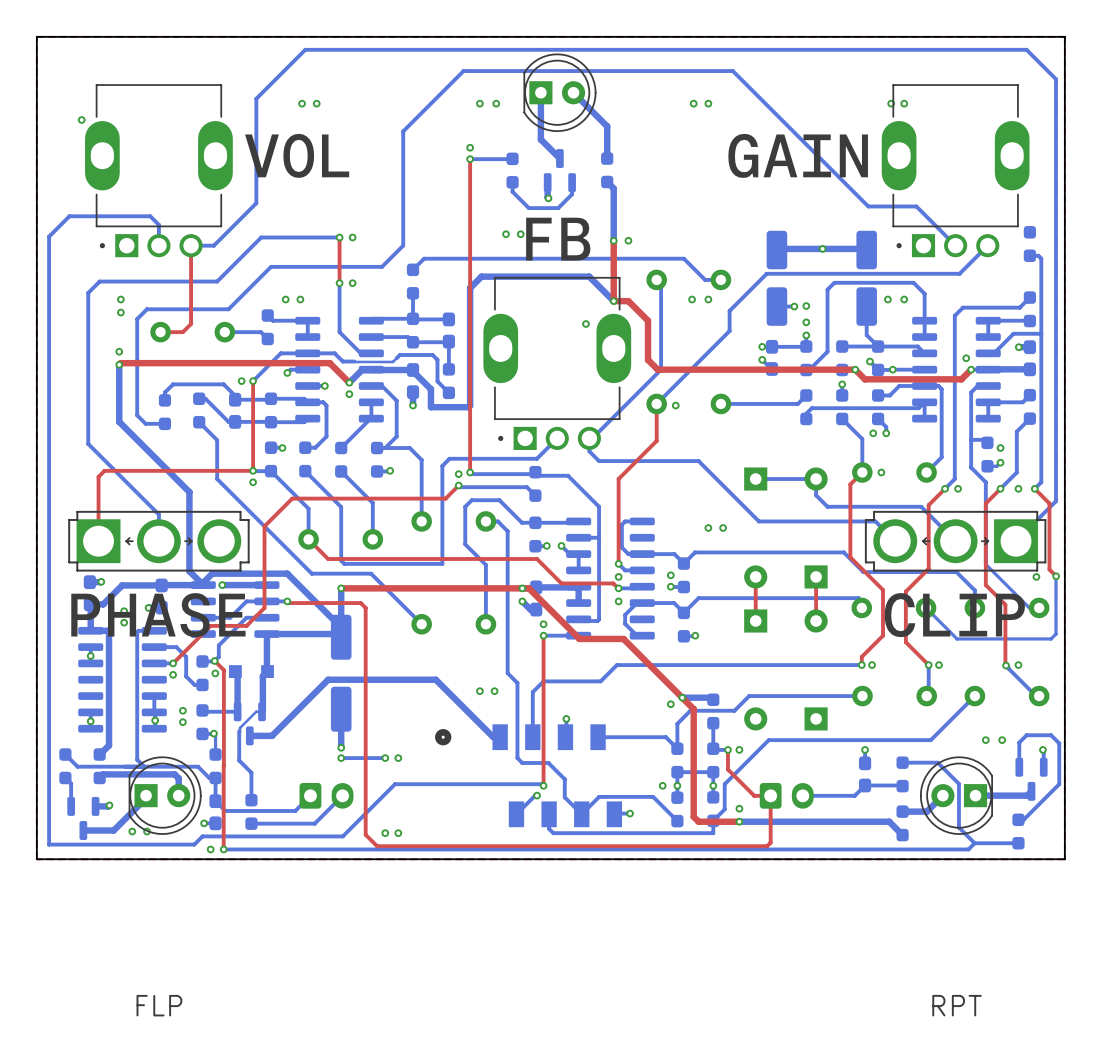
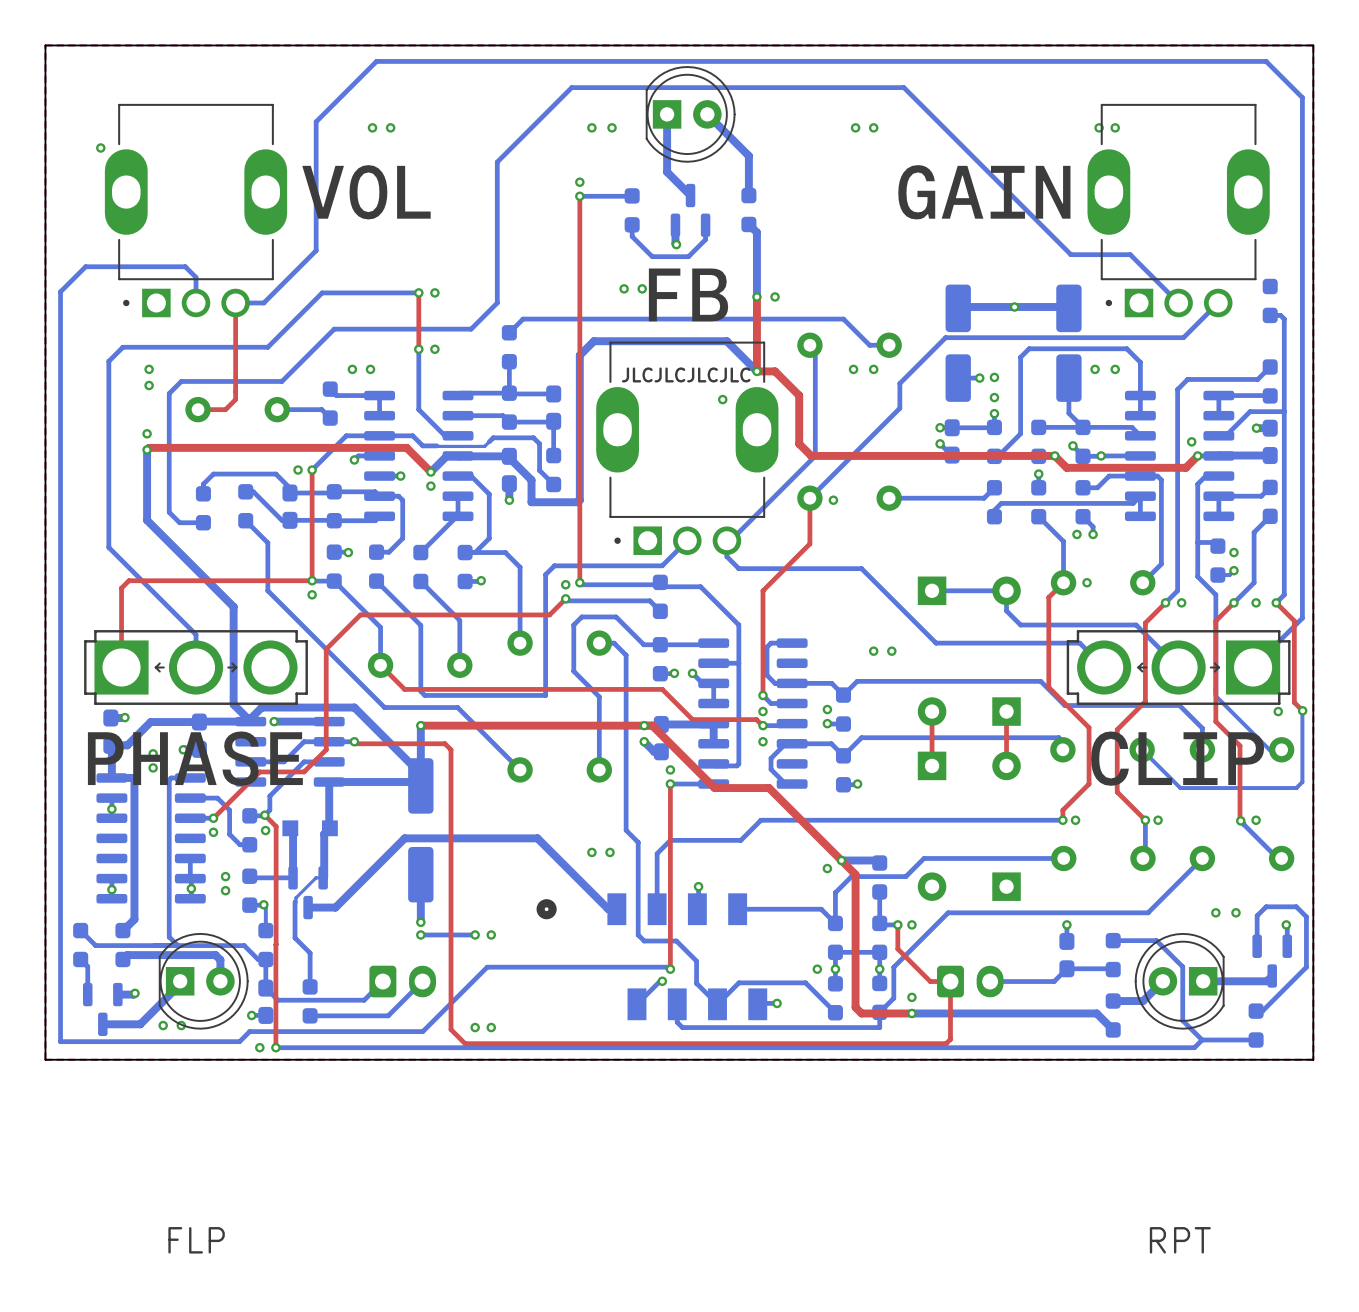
text: none -> JLCJLCJLCJLC (686, 374)

